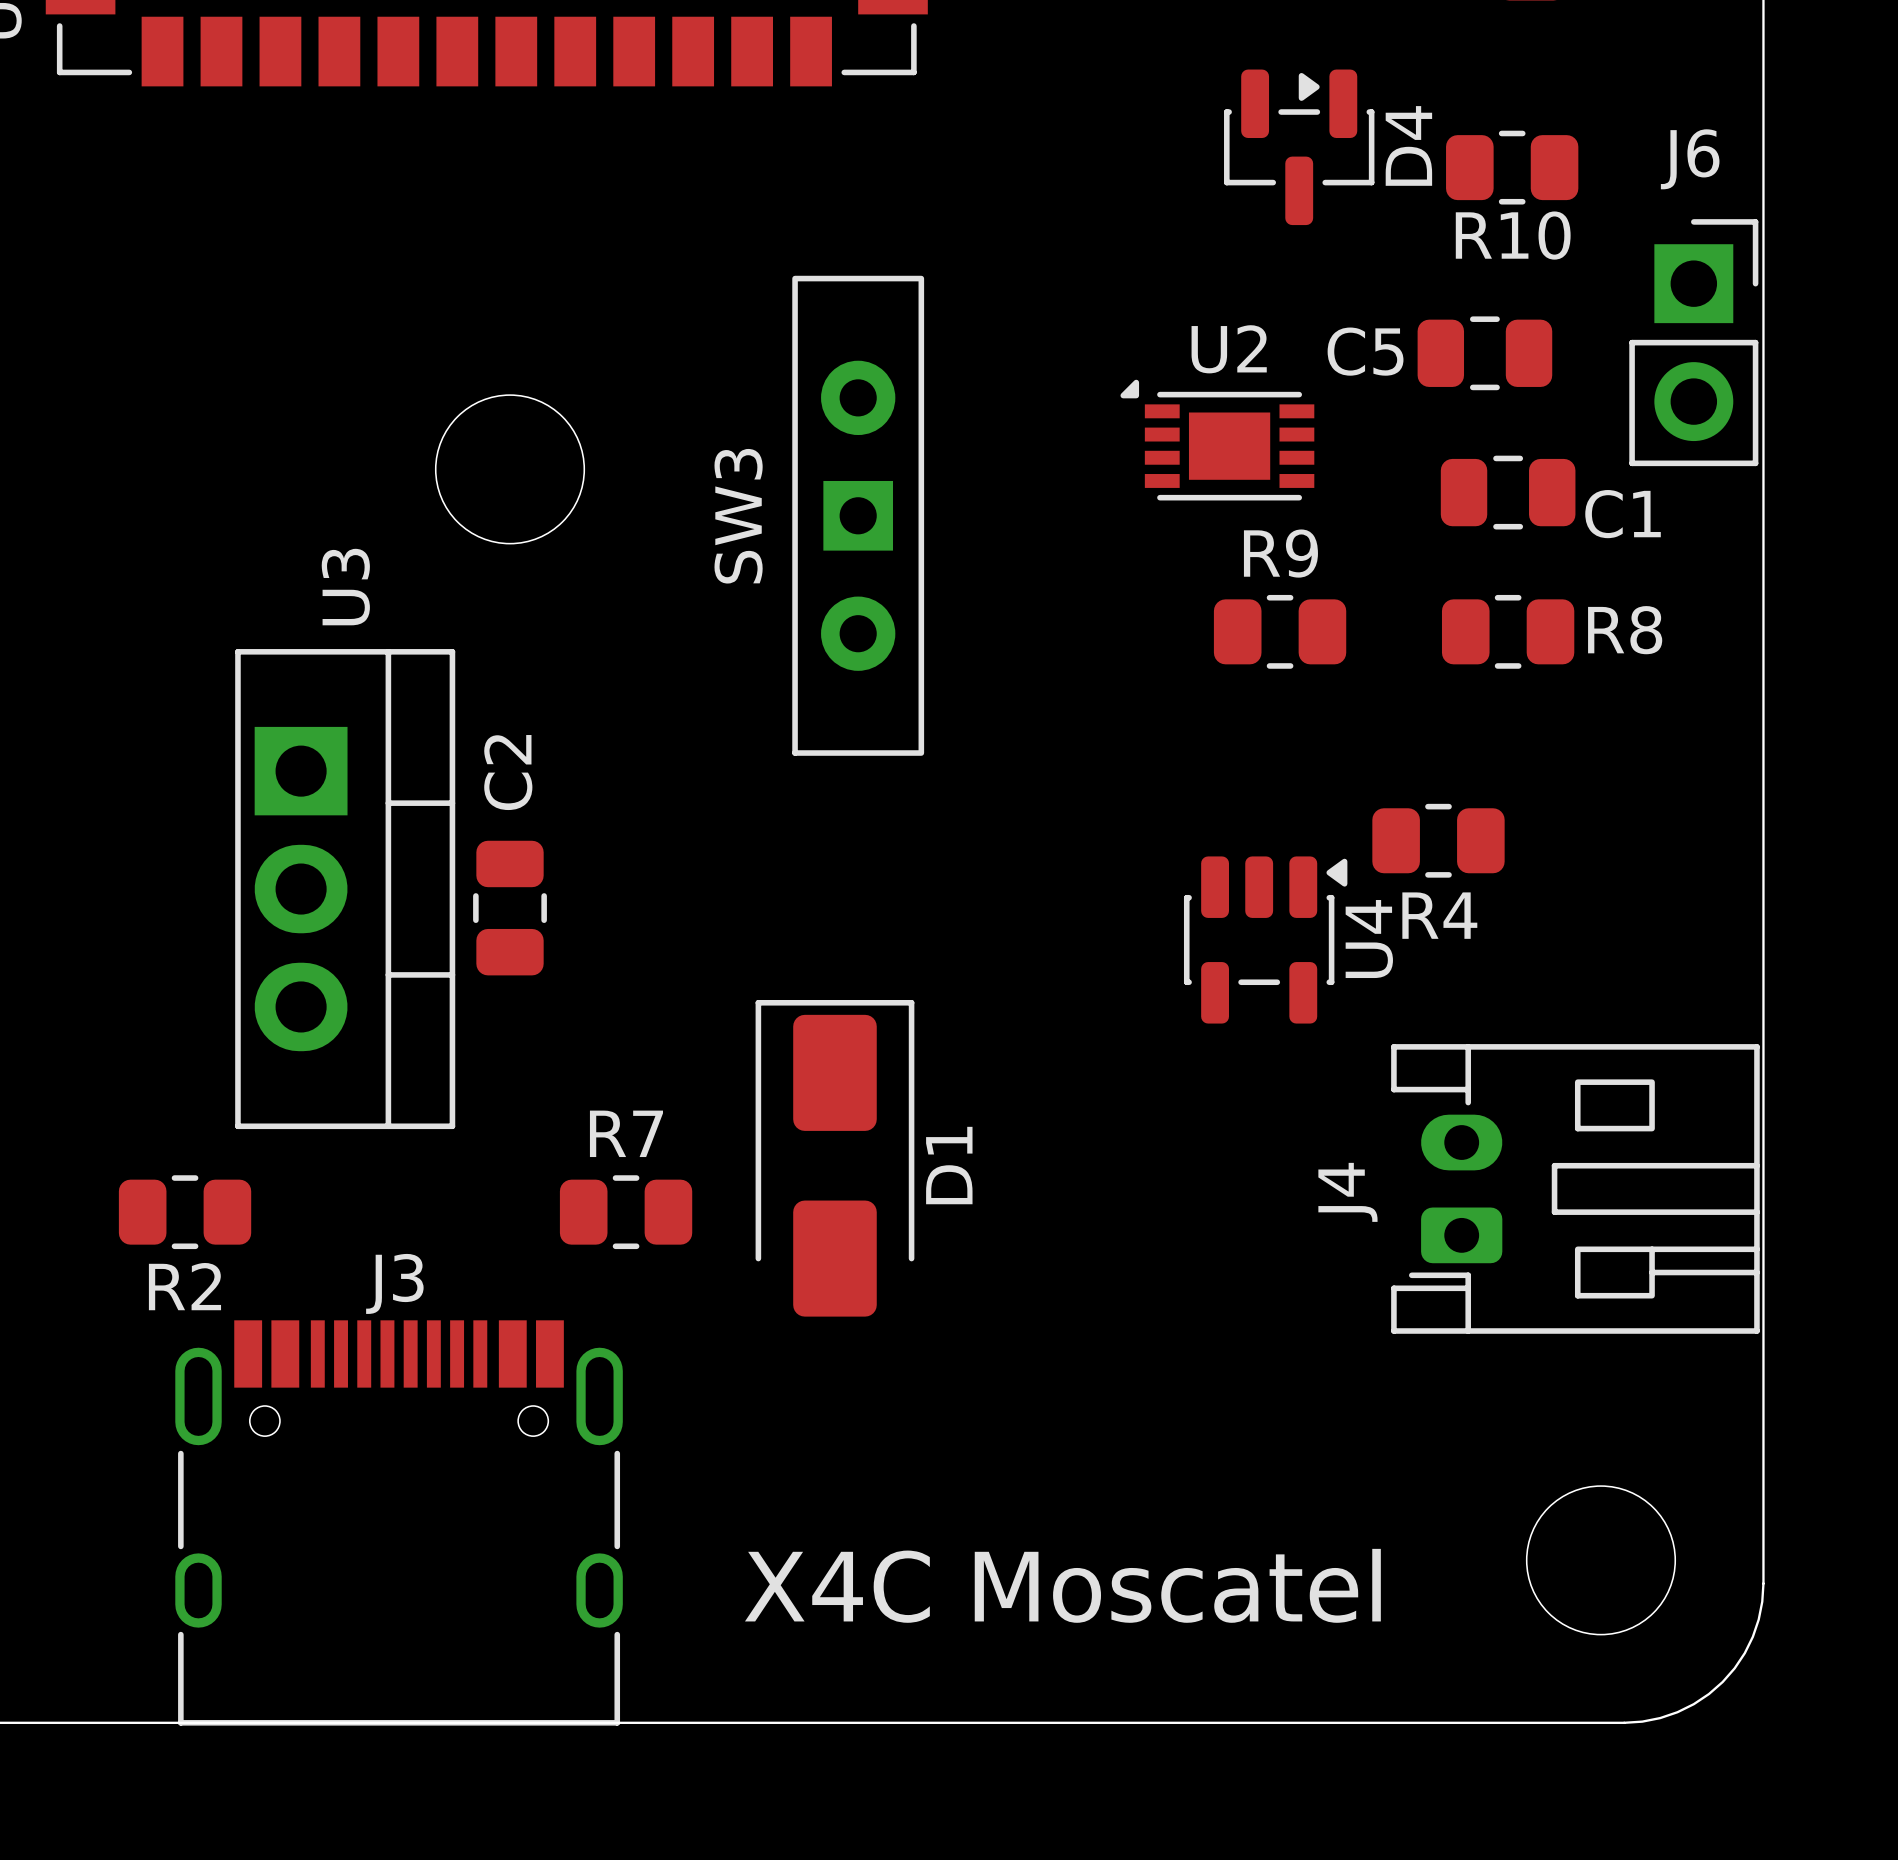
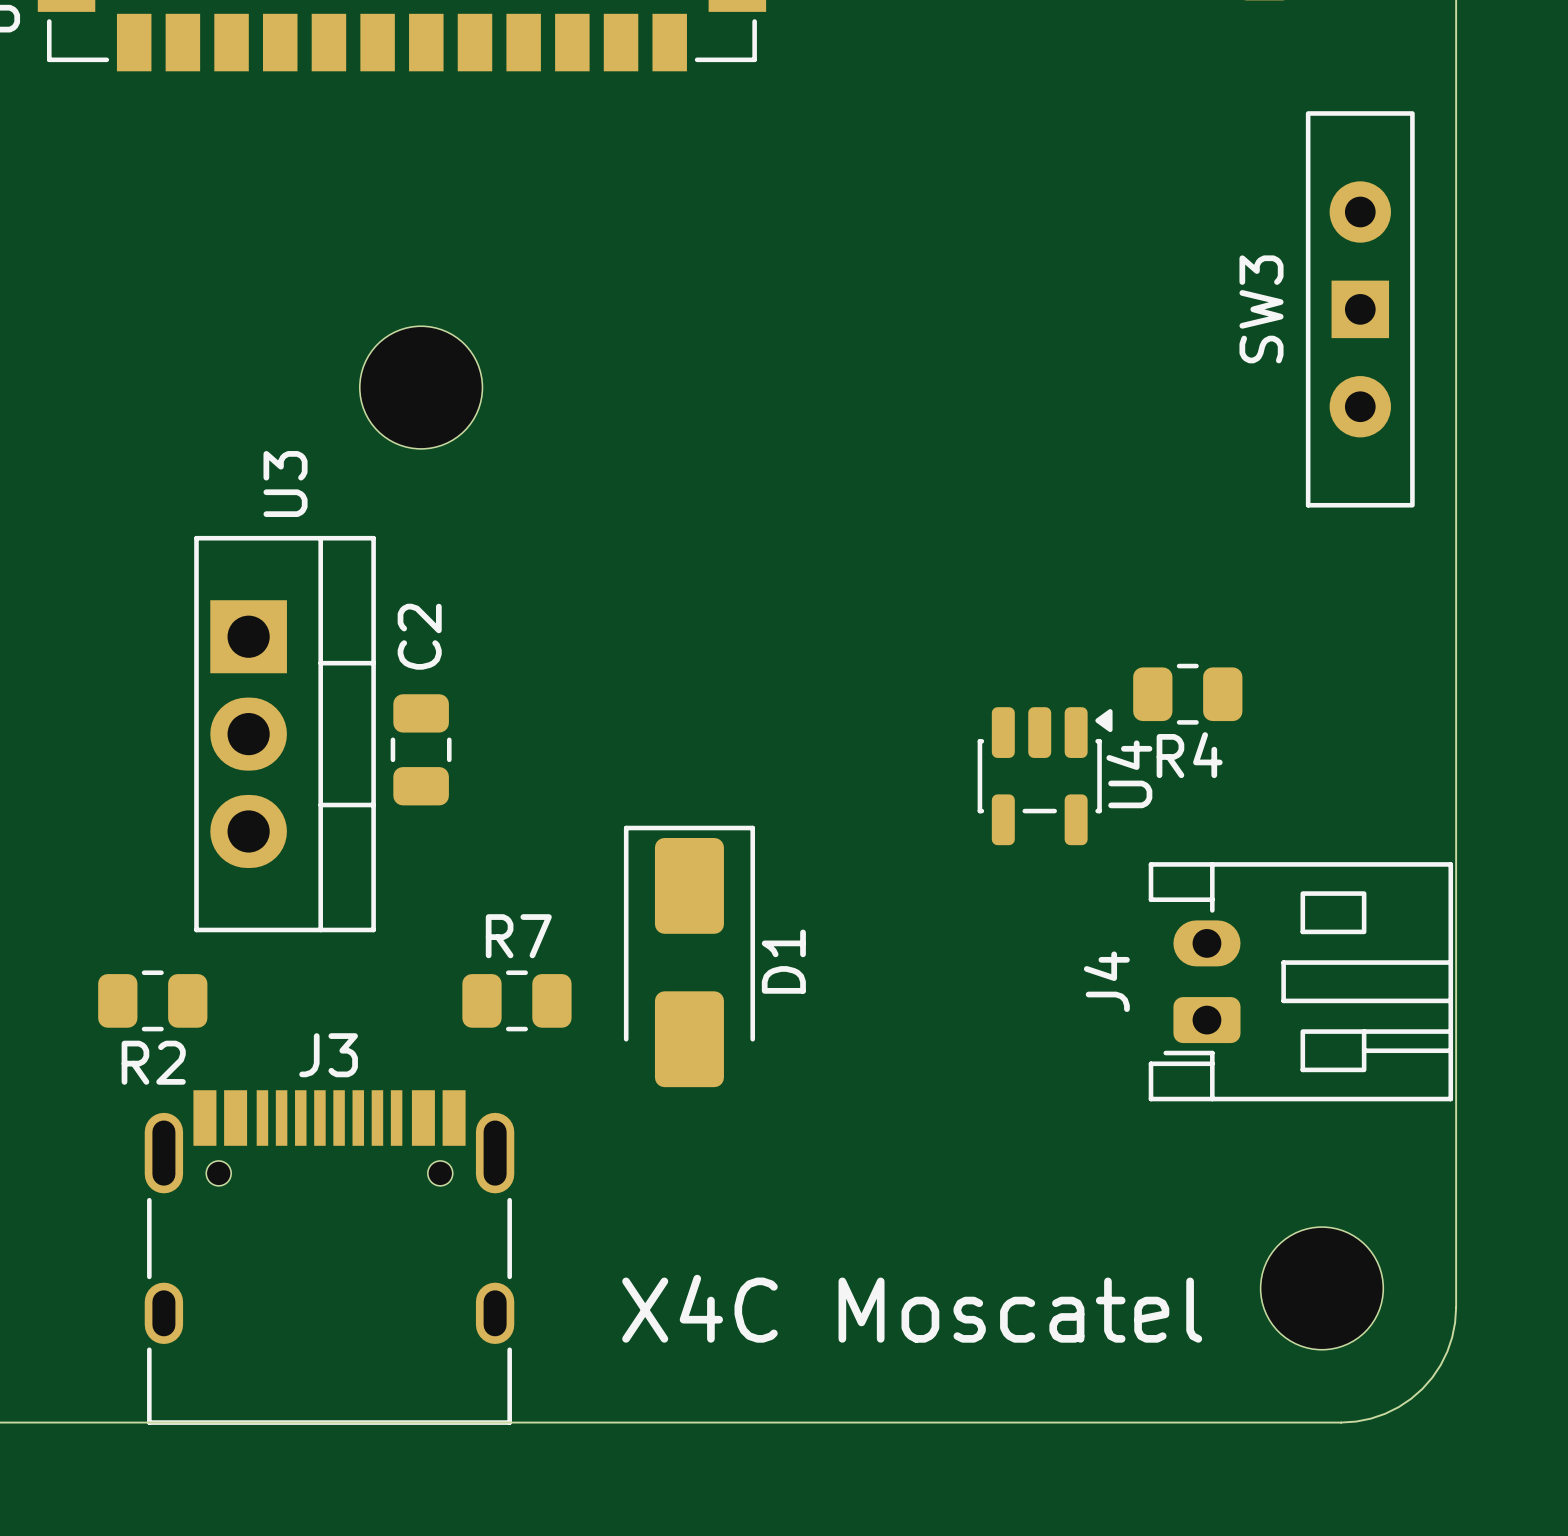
D4: (1299, 147) -> none
R10: (1512, 167) -> none
J6: (1693, 342) -> none
C5: (1484, 353) -> none
U2: (1217, 440) -> none
C1: (1508, 492) -> none
SW3 position: (858, 515) -> (1360, 309)
R9: (1280, 631) -> none
R8: (1508, 631) -> none

